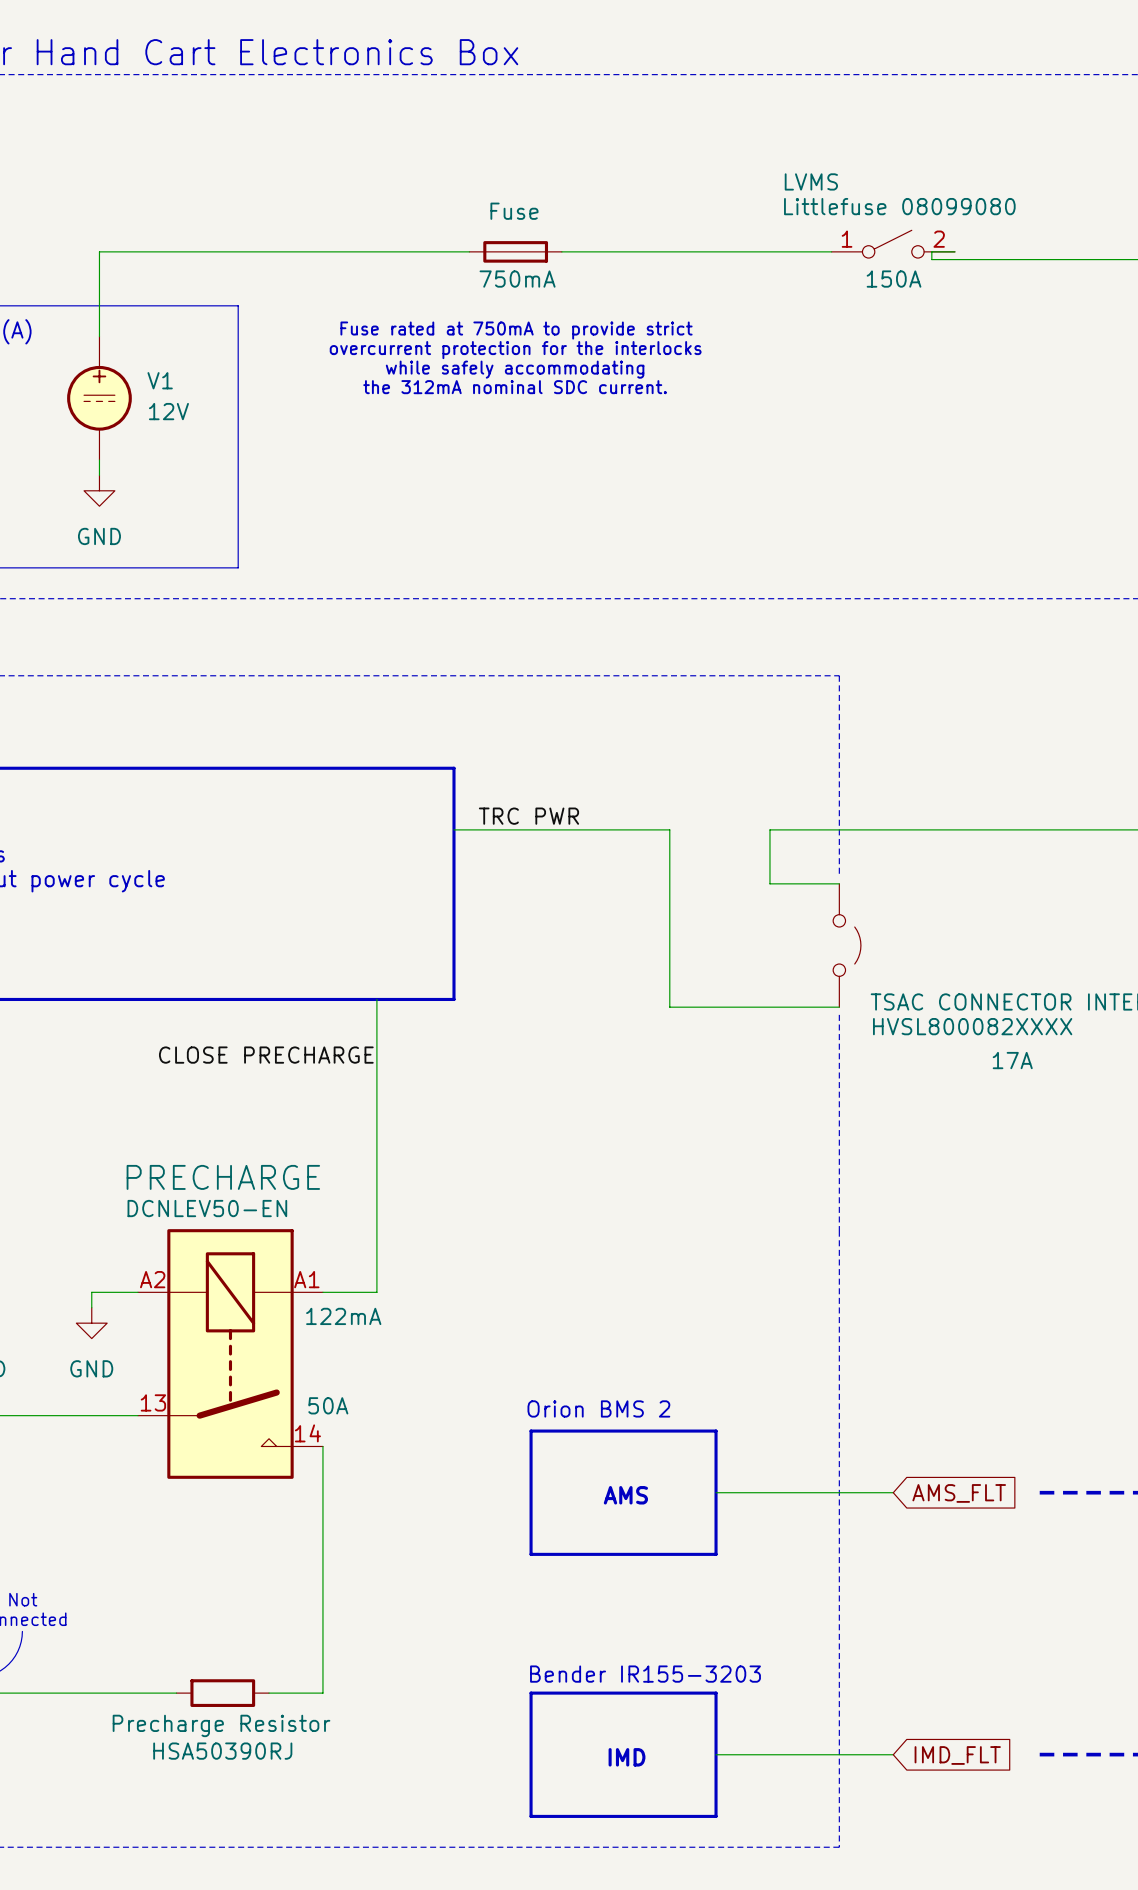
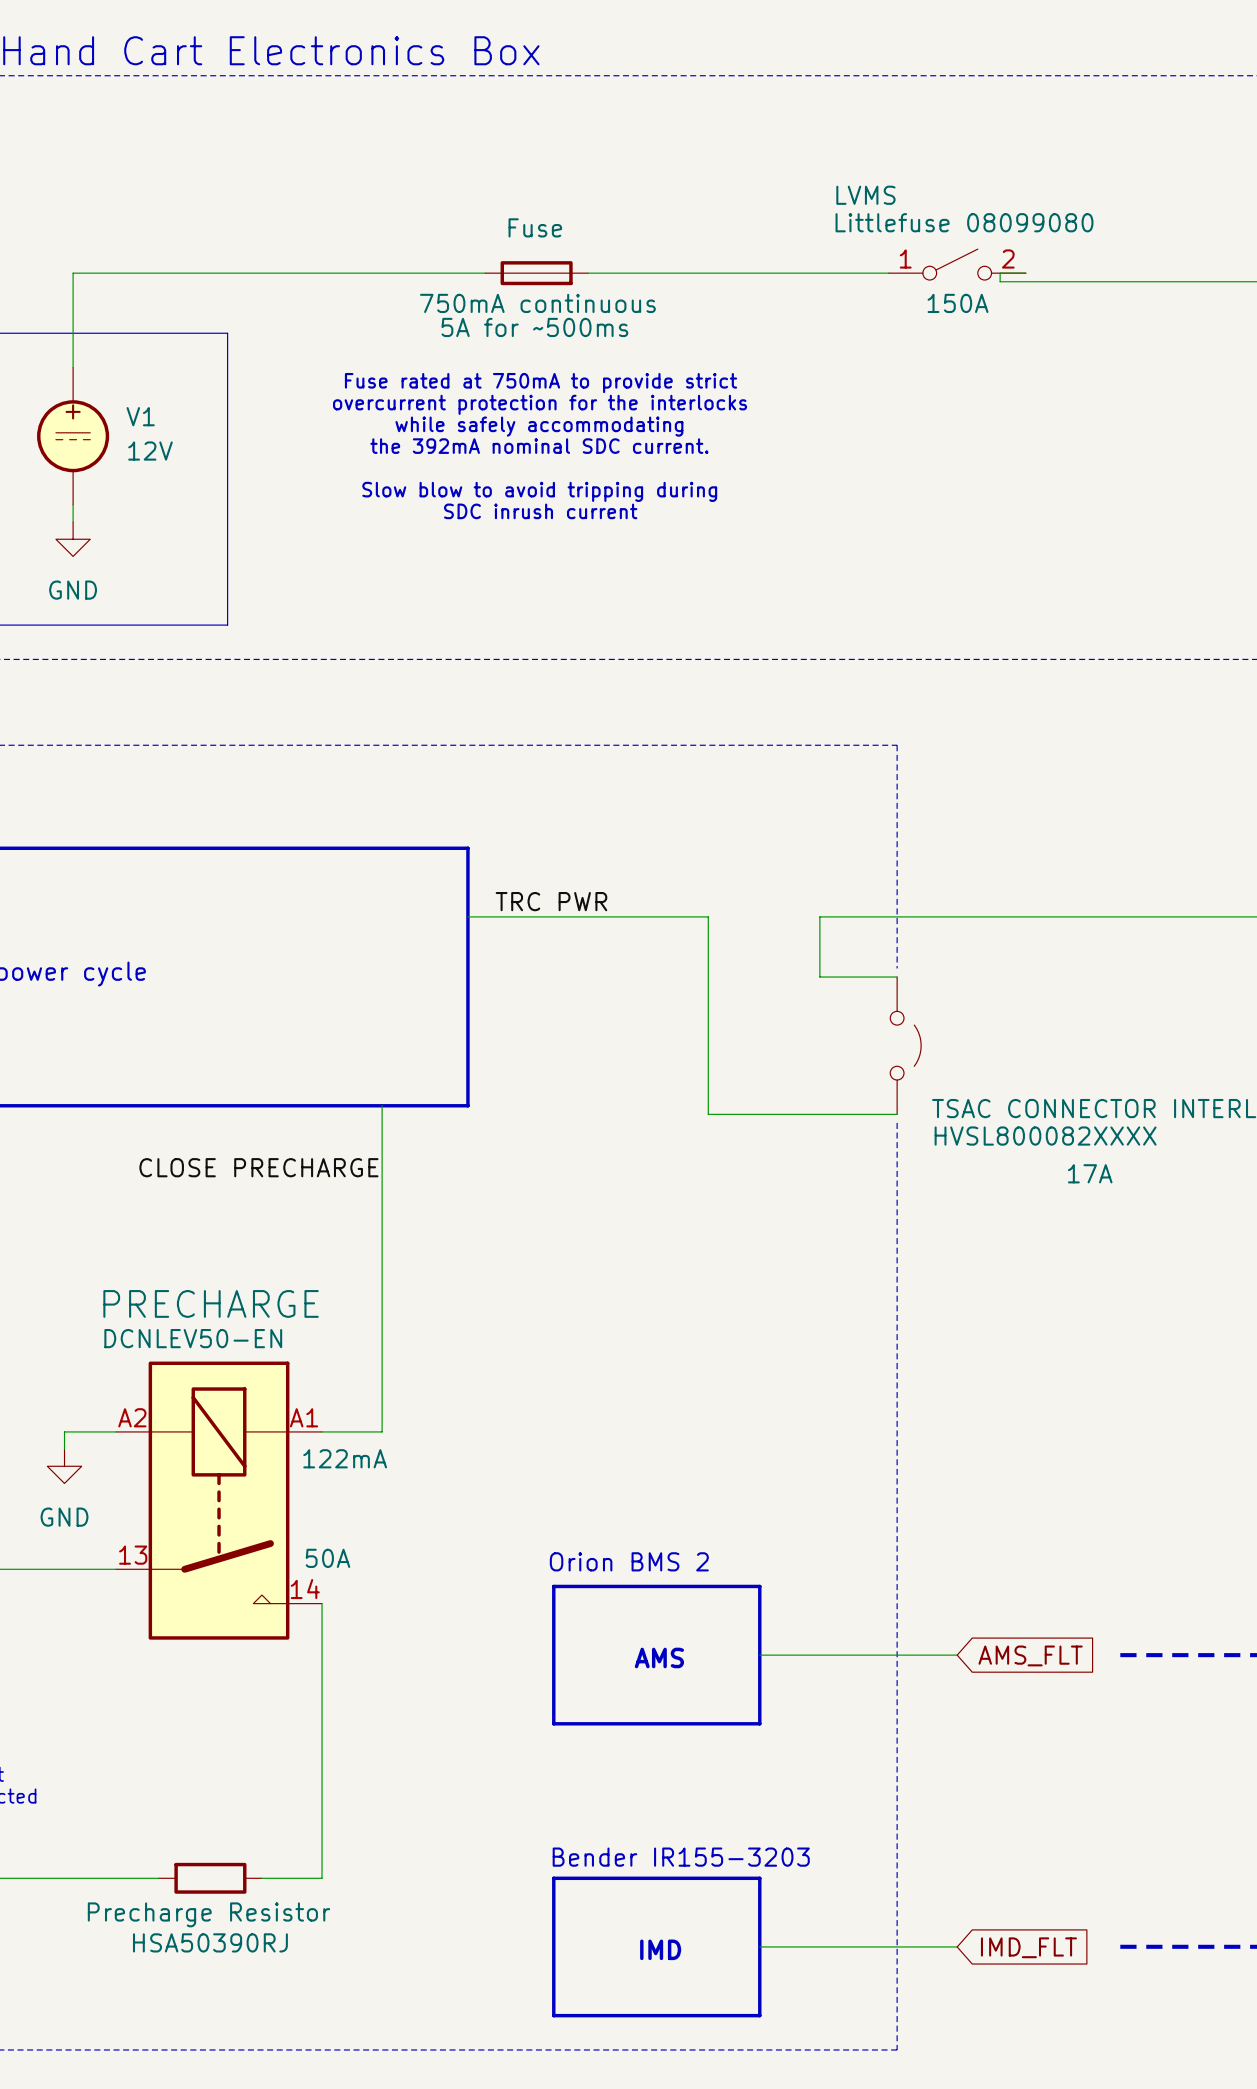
part text: 750mA (517, 279) -> 750mA continuous (537, 303)
part text: none -> 5A for ~500ms (534, 327)
text: Fuse rated at 750mA to provide strict (516, 330) -> none
text: overcurrent protection for the interlocks (515, 350) -> Fuse rated at 750mA to provide strict (541, 383)
text: while safely accommodating (515, 369) -> overcurrent protection for the interlocks (540, 404)
text: the 312mA nominal SDC current. (515, 387) -> while safely accommodating (539, 426)
text: none -> the 392mA nominal SDC current. (539, 446)
text: none -> Slow blow to avoid tripping during (539, 491)
text: none -> SDC inrush current (540, 511)

